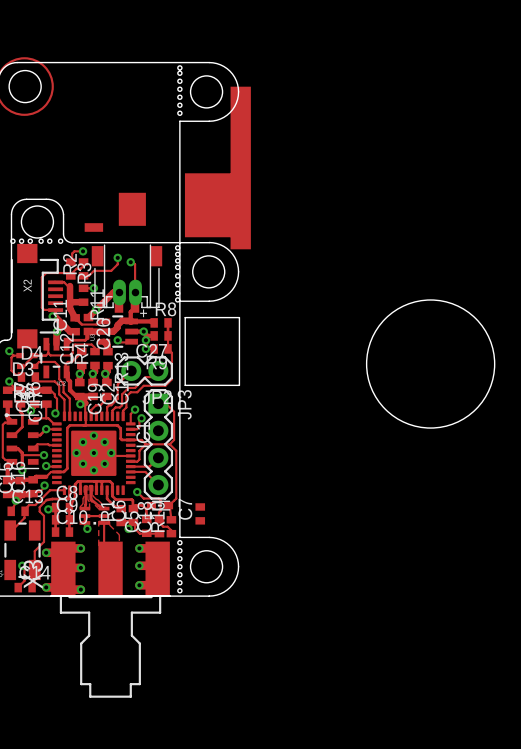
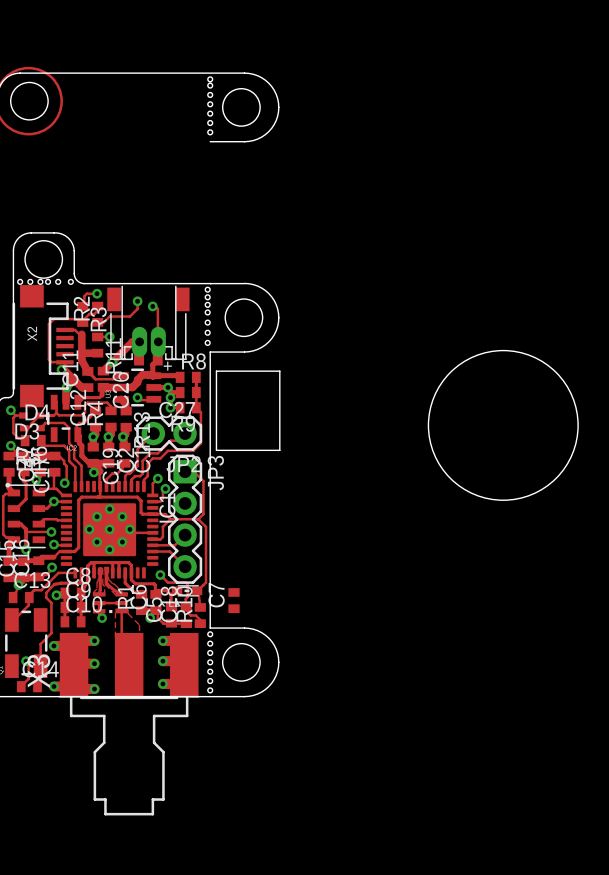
drawing: [184, 86, 251, 250] -> none
board edge: (179, 121) (179, 301) -> none
drawing: [118, 192, 146, 226] -> none
drawing: [84, 223, 104, 232] -> none
hole: (12, 241) -> none
hole: none -> (20, 281)
hole: (21, 241) -> none
hole: none -> (30, 281)
hole: (30, 241) -> none
hole: none -> (40, 281)
hole: (177, 299) -> none

